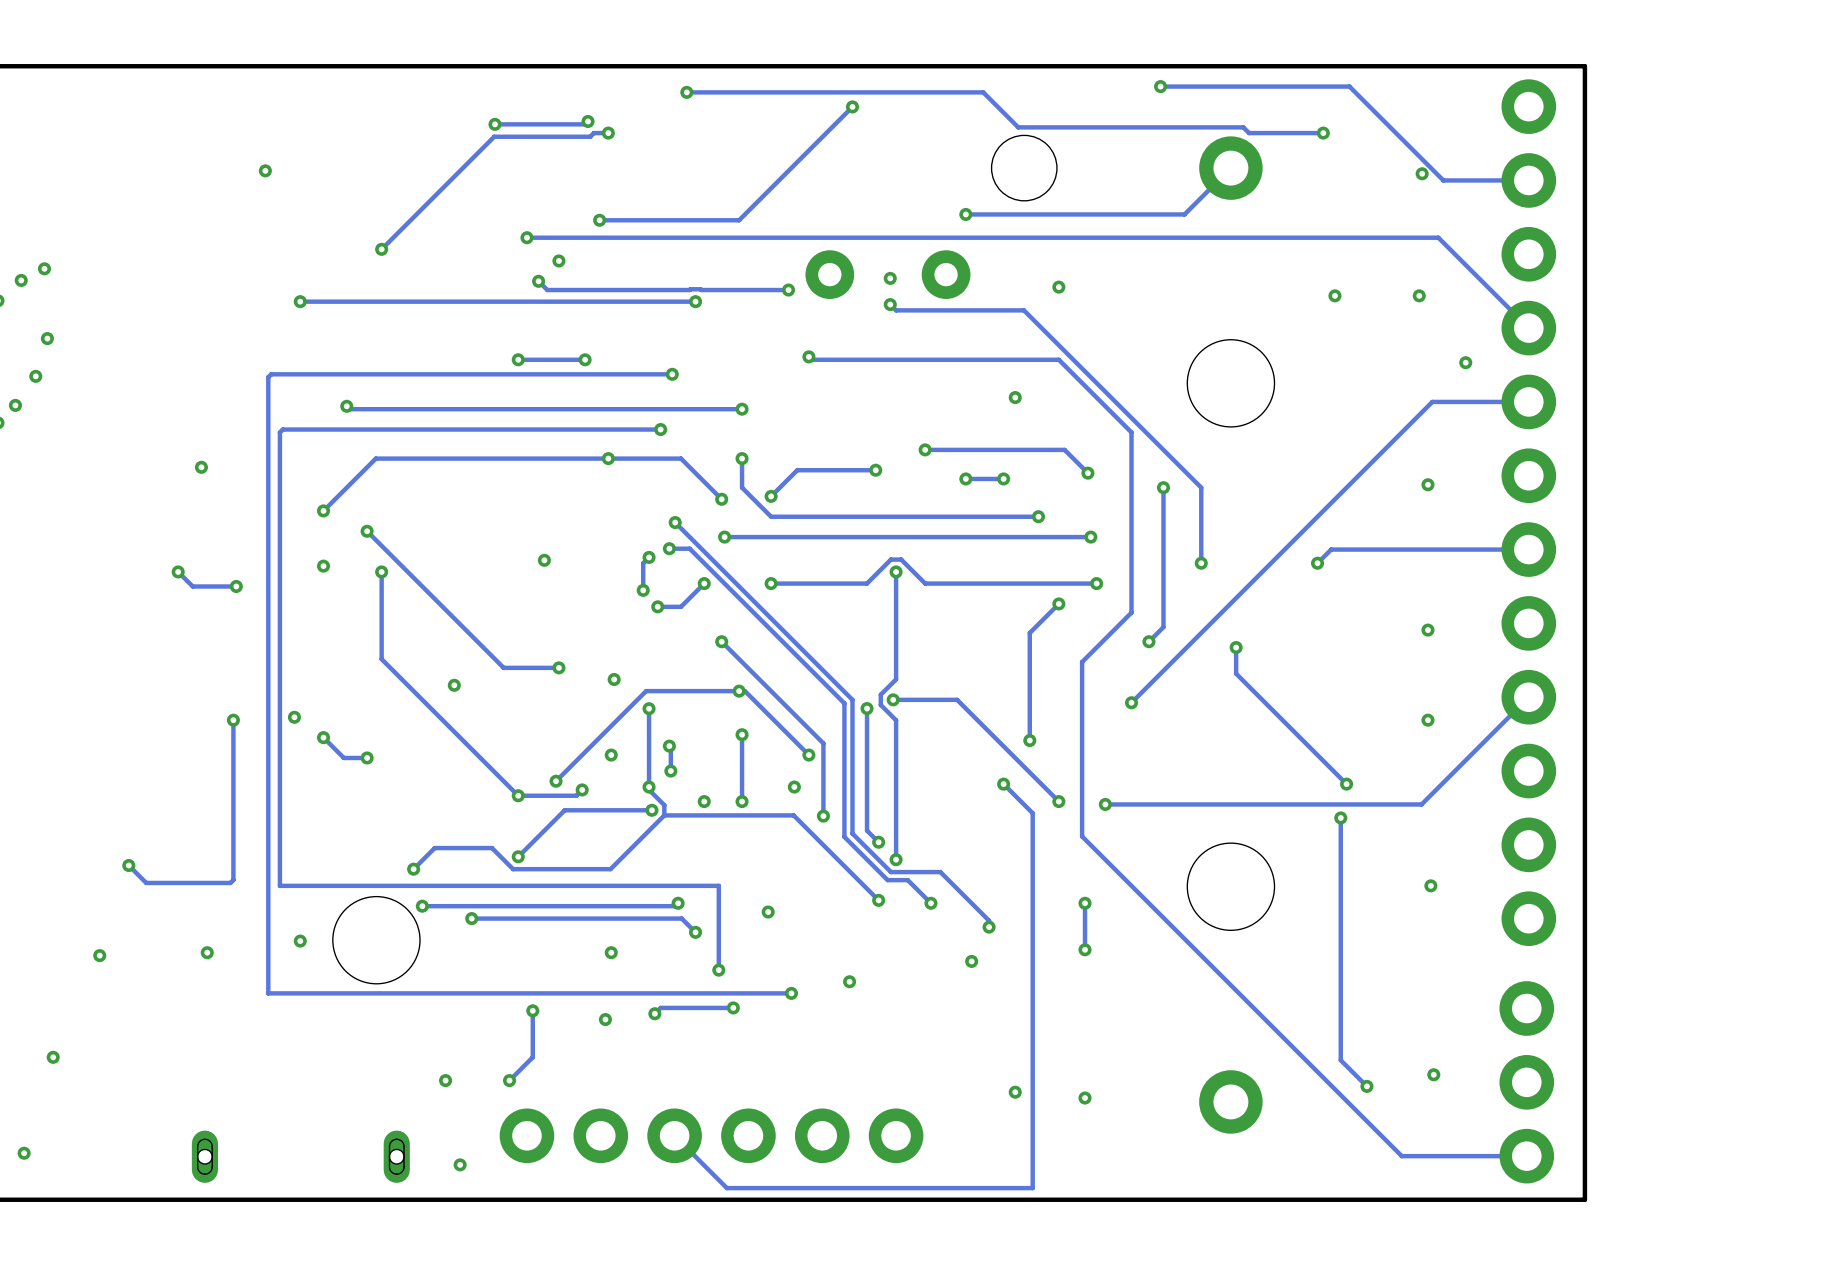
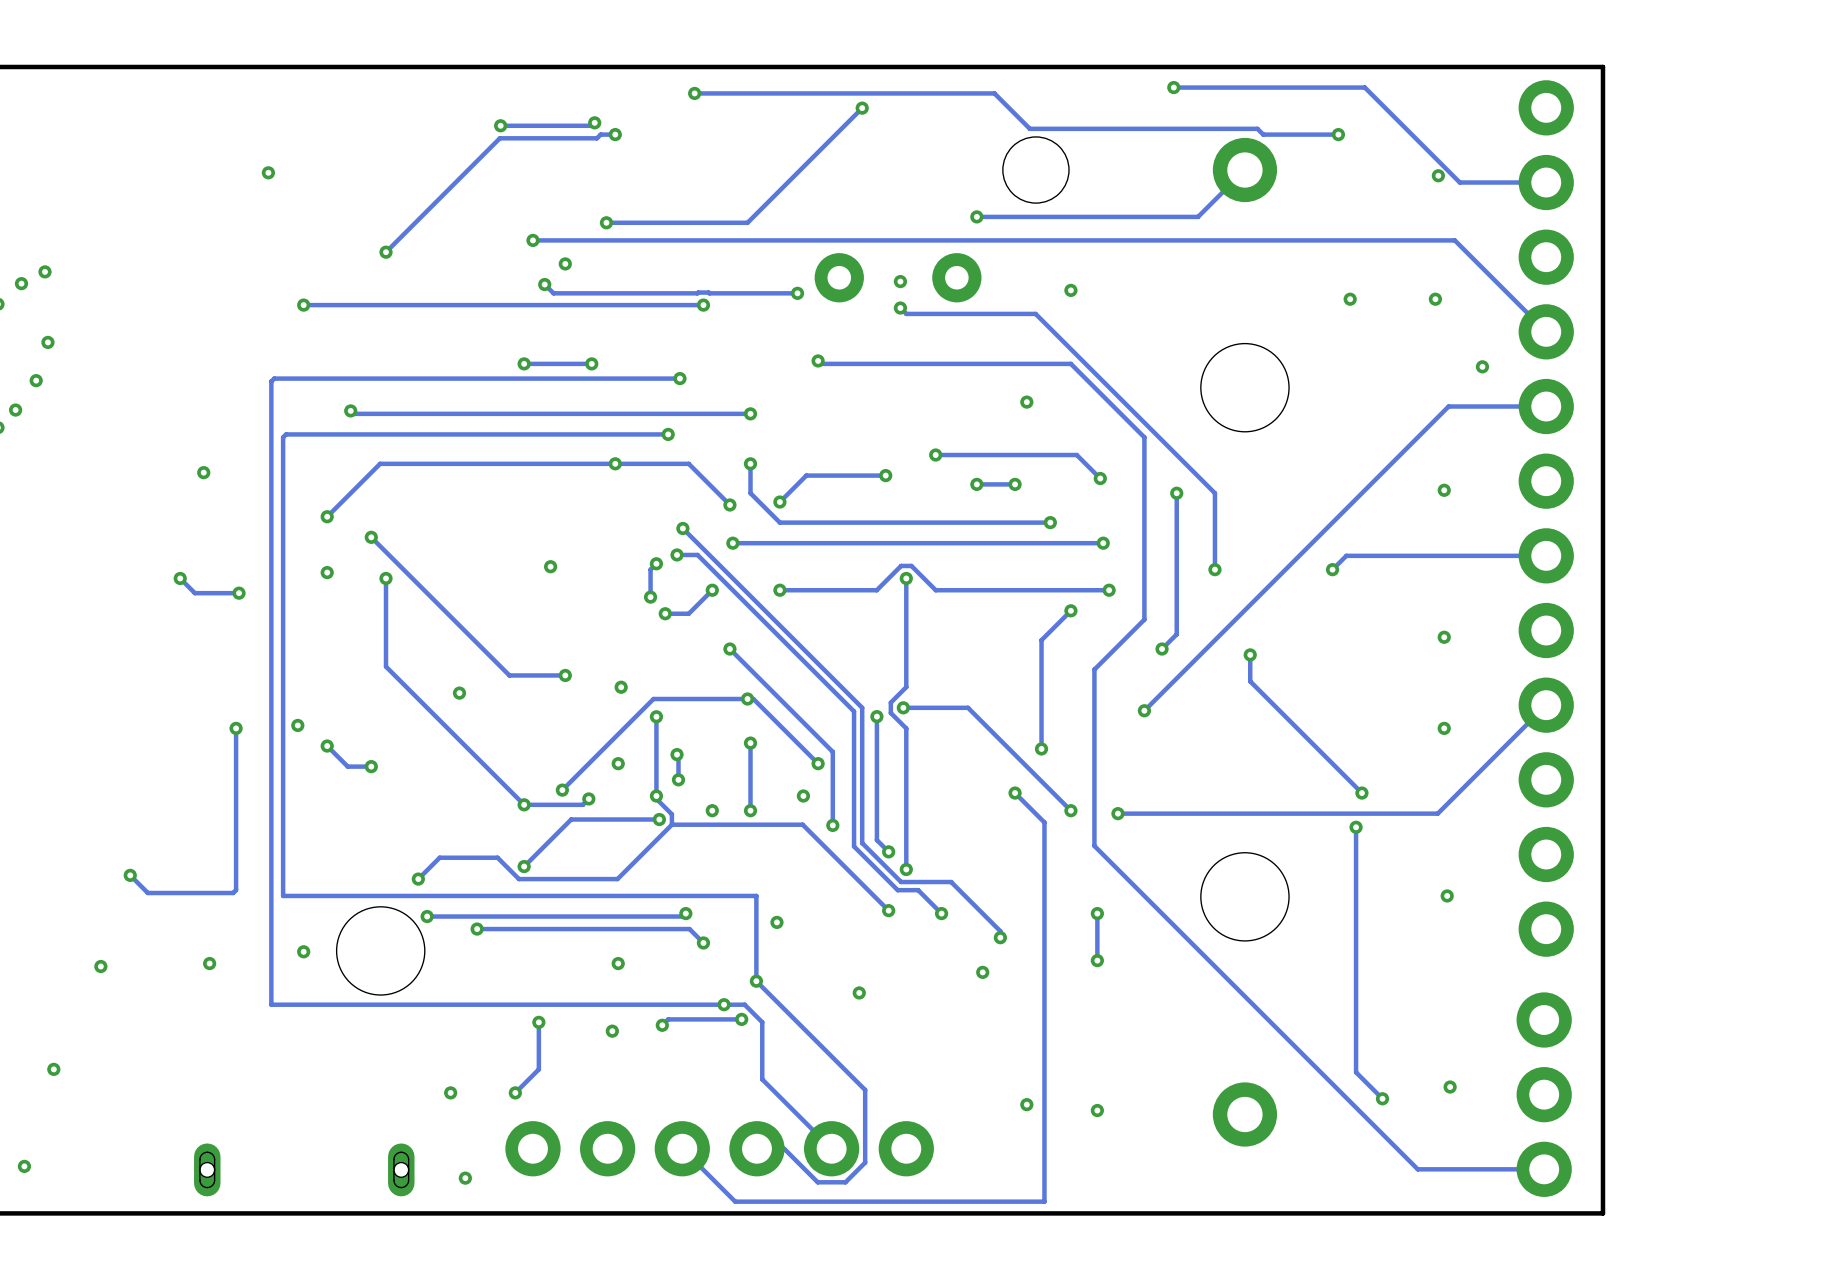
track: (718, 885) (718, 970) -> (726, 895) (756, 895) (756, 981) (865, 1089) (865, 1162) (845, 1182) (817, 1182) (784, 1148) (756, 1148)
via: (718, 970) -> none
via: none -> (756, 981)
via: none -> (724, 1004)
track: (791, 993) (736, 993) -> (831, 1148) (762, 1079) (762, 1022) (744, 1004)
via: (791, 993) -> none

